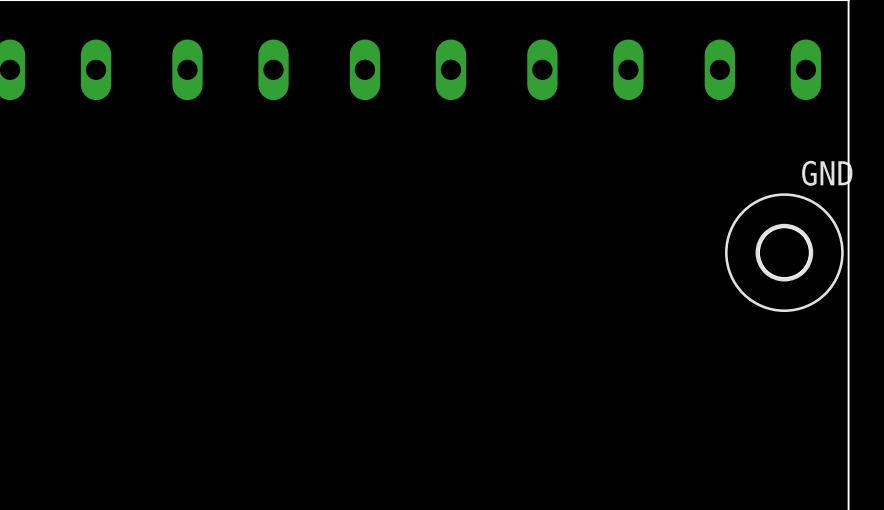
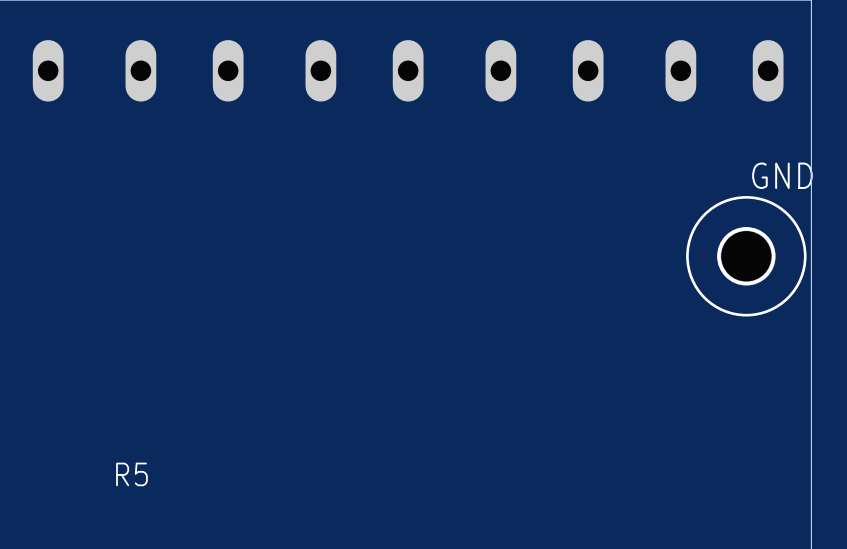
R5: none -> (131, 474)

